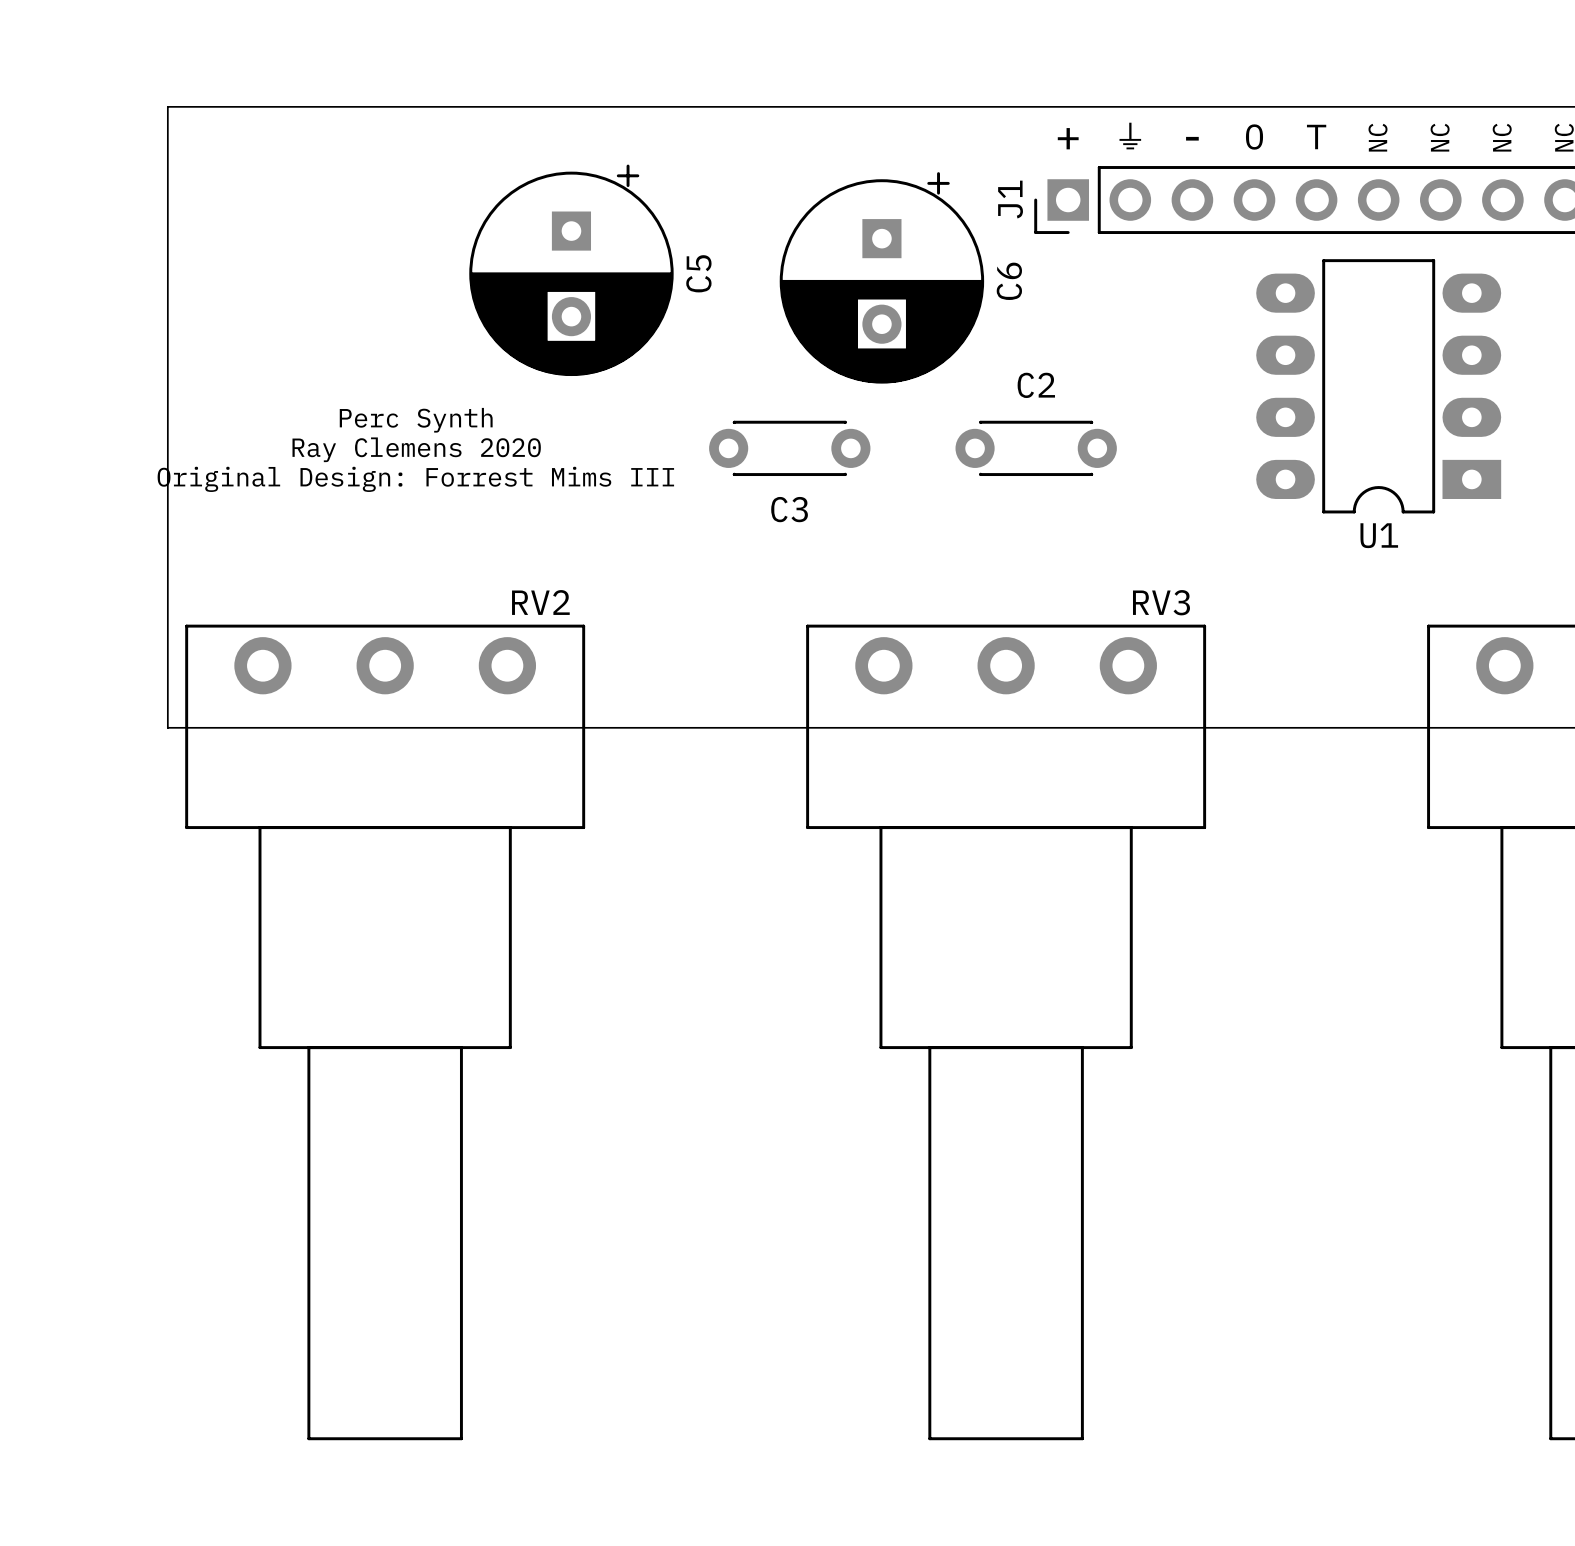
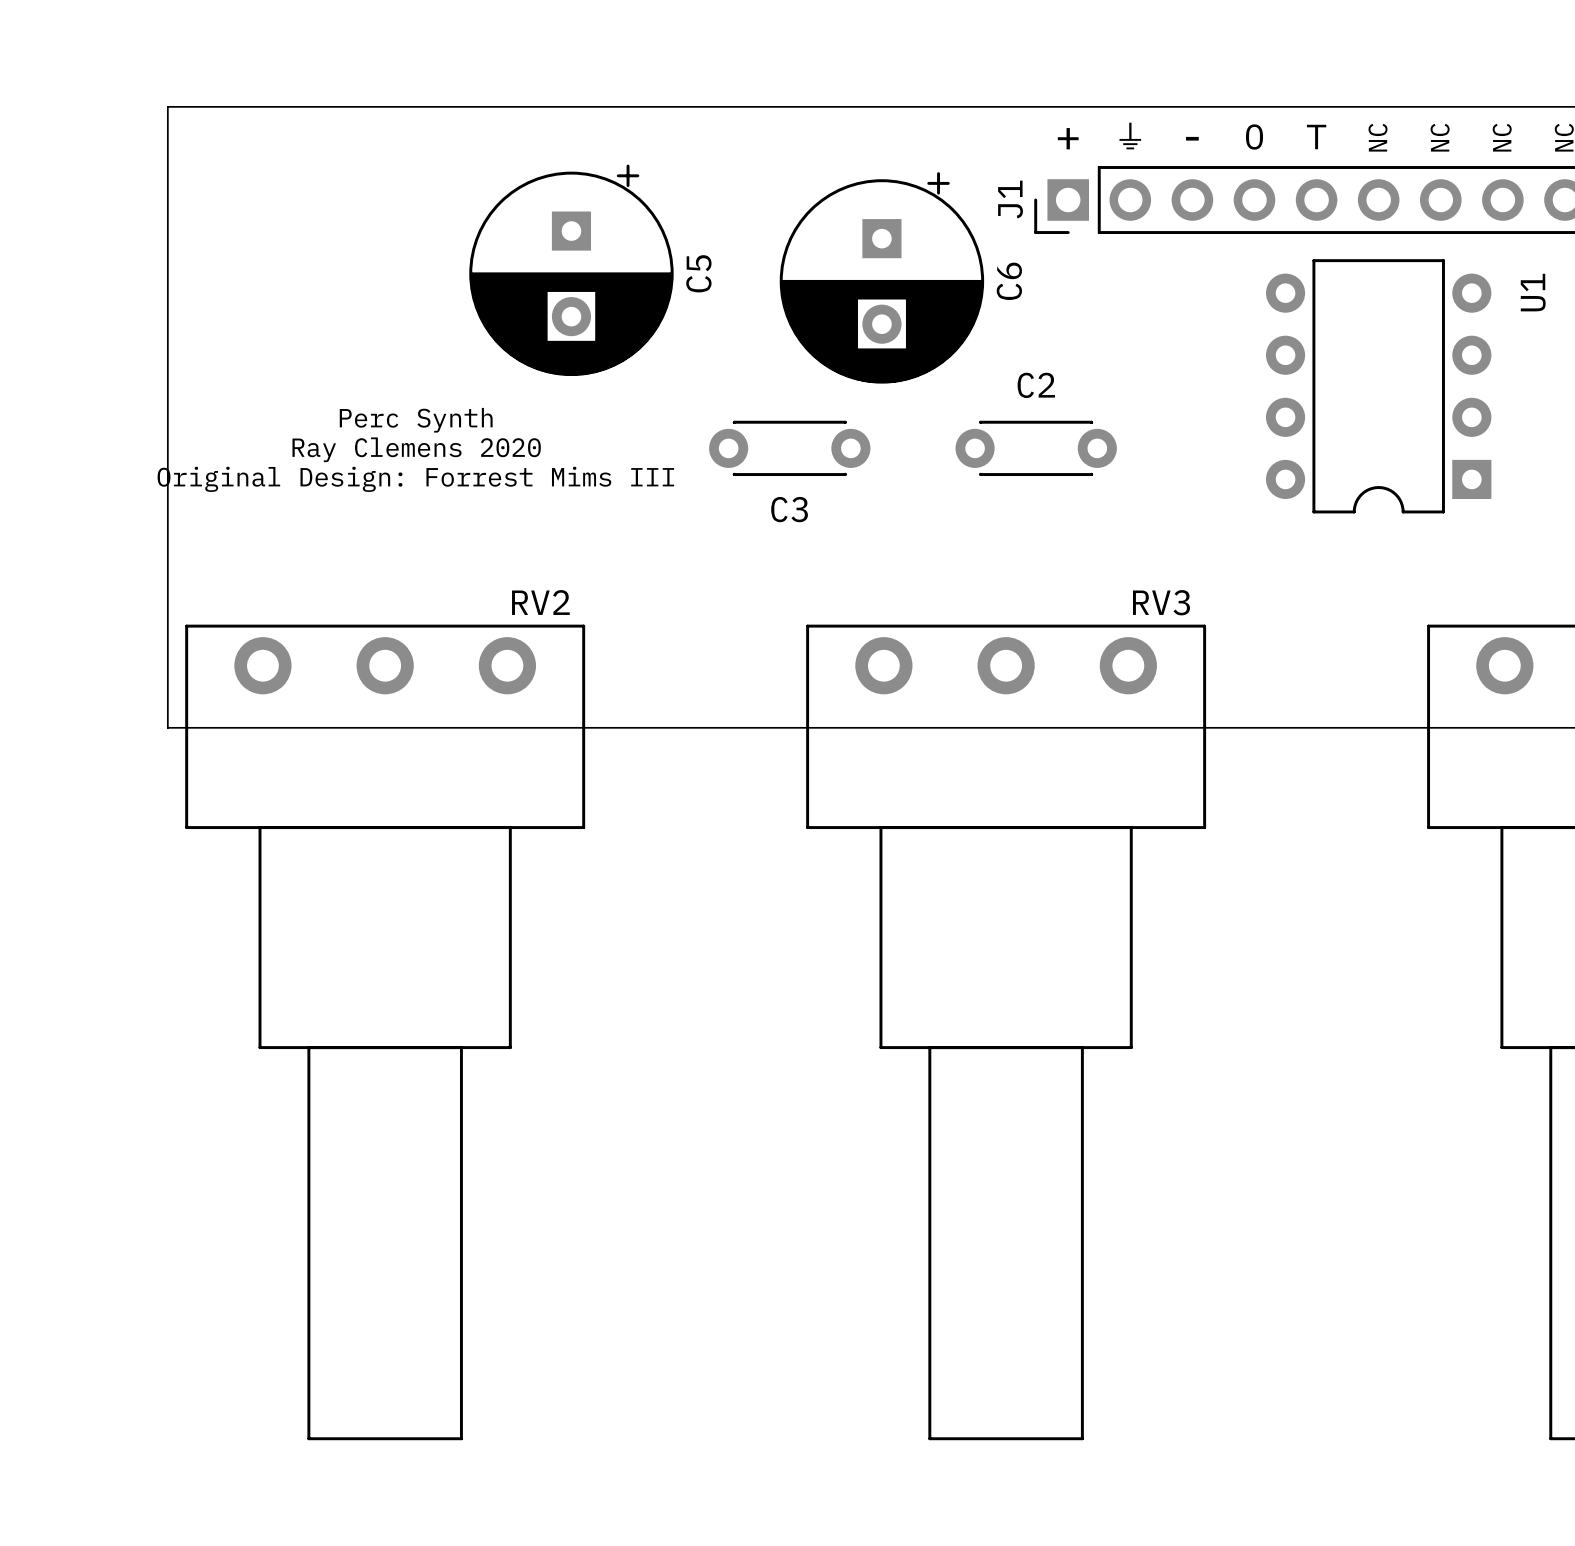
U1 footprint: [1256, 259, 1502, 514] -> [1265, 259, 1492, 514]
U1 name position: U1 (1379, 535) -> U1 (1533, 292)

